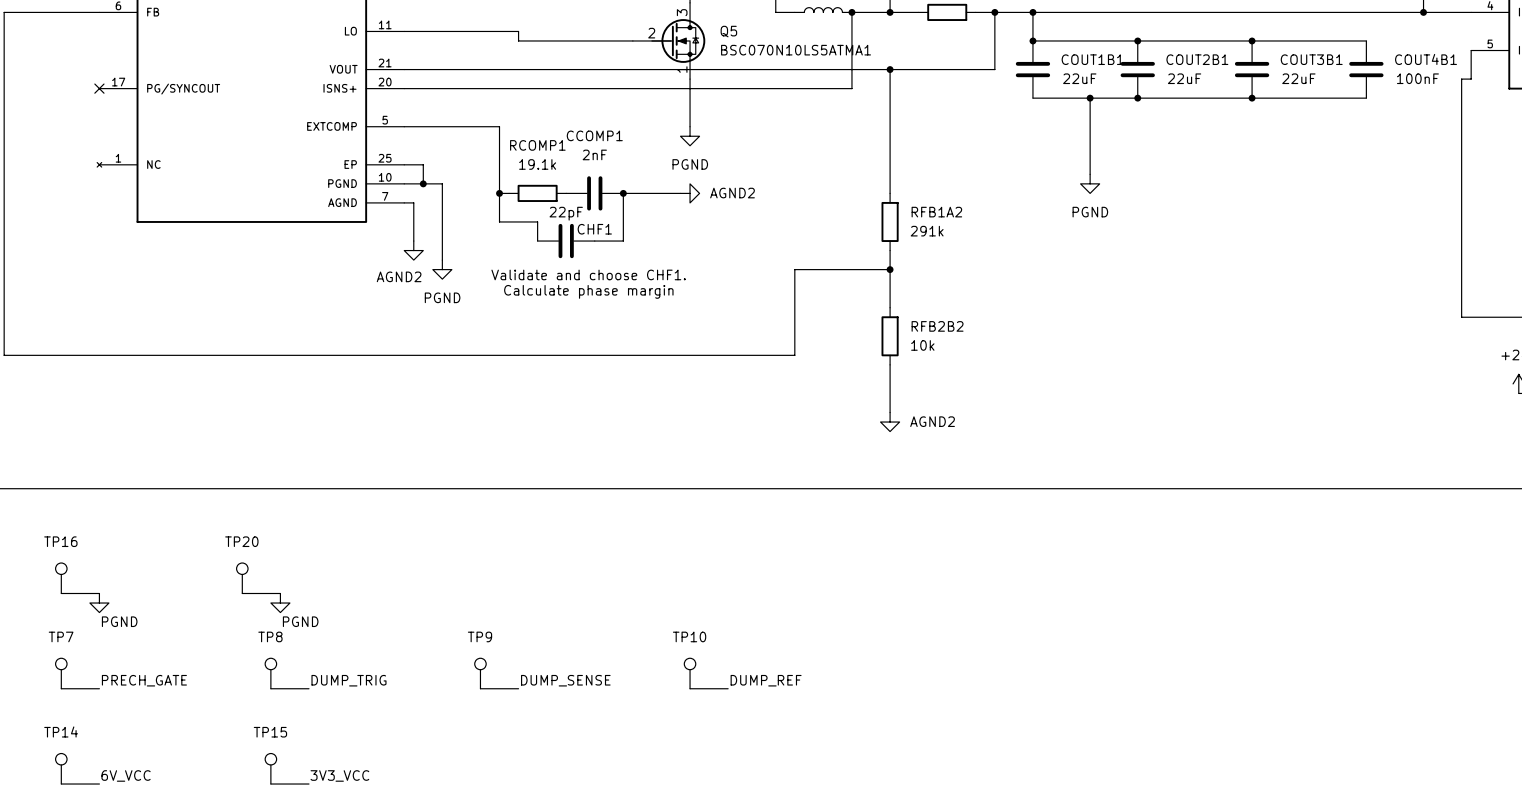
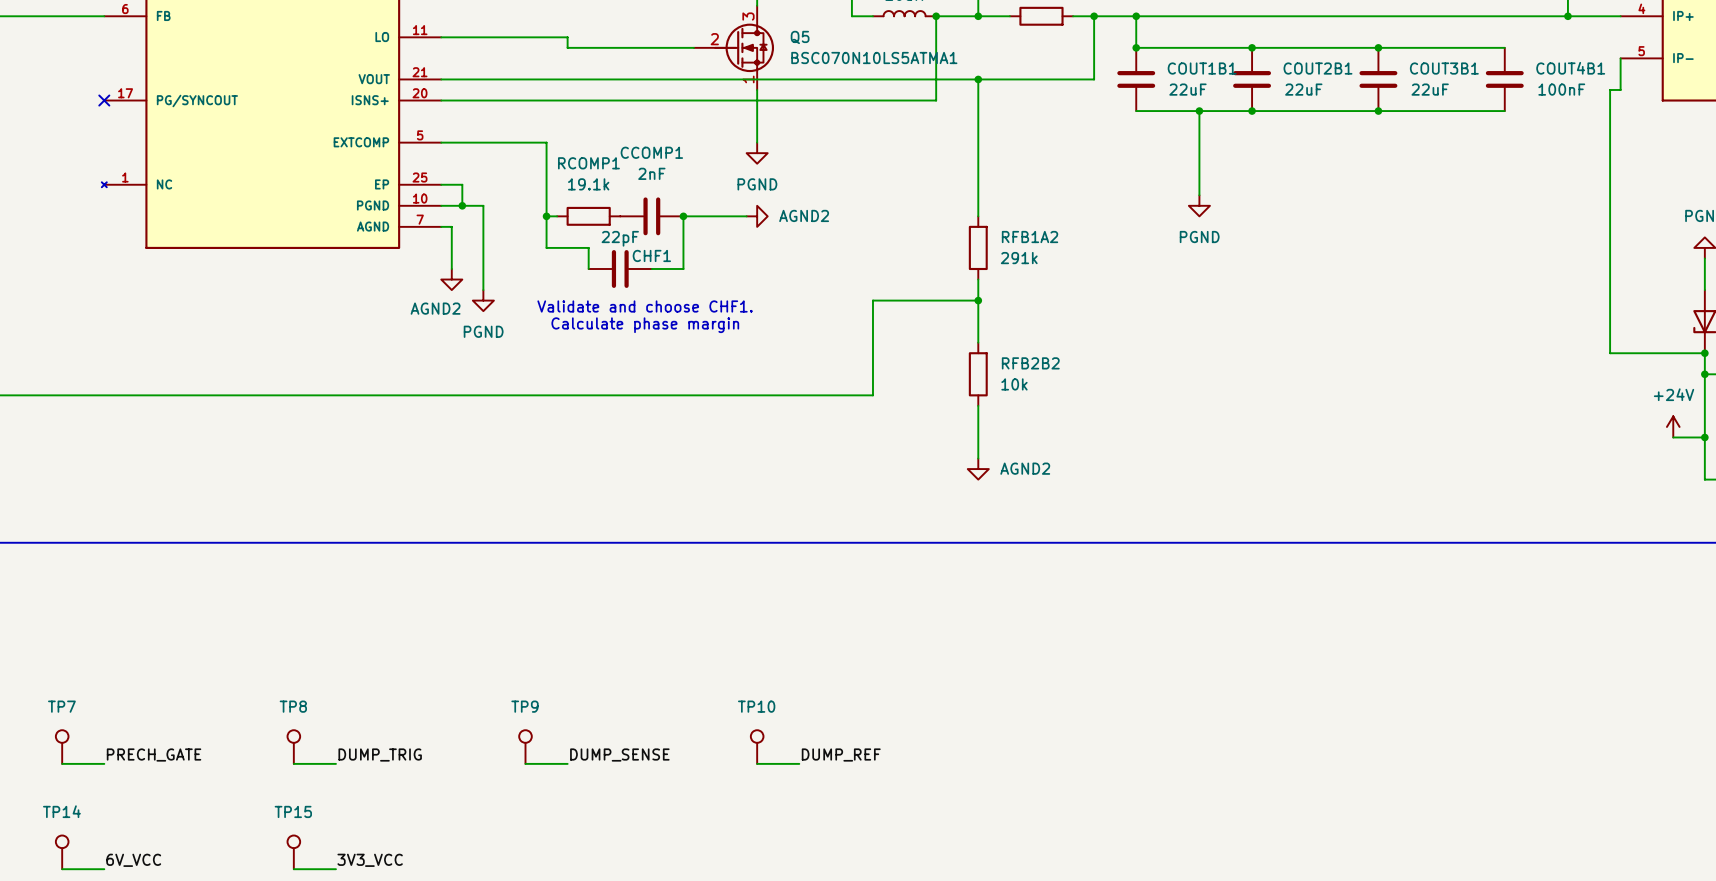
TP16: (61, 578) -> none
TP20: (242, 578) -> none
wire: (61, 593) (99, 593) -> none
wire: (242, 593) (280, 593) -> none
power symbol: PGND (99, 603) -> none
power symbol: PGND (280, 603) -> none

